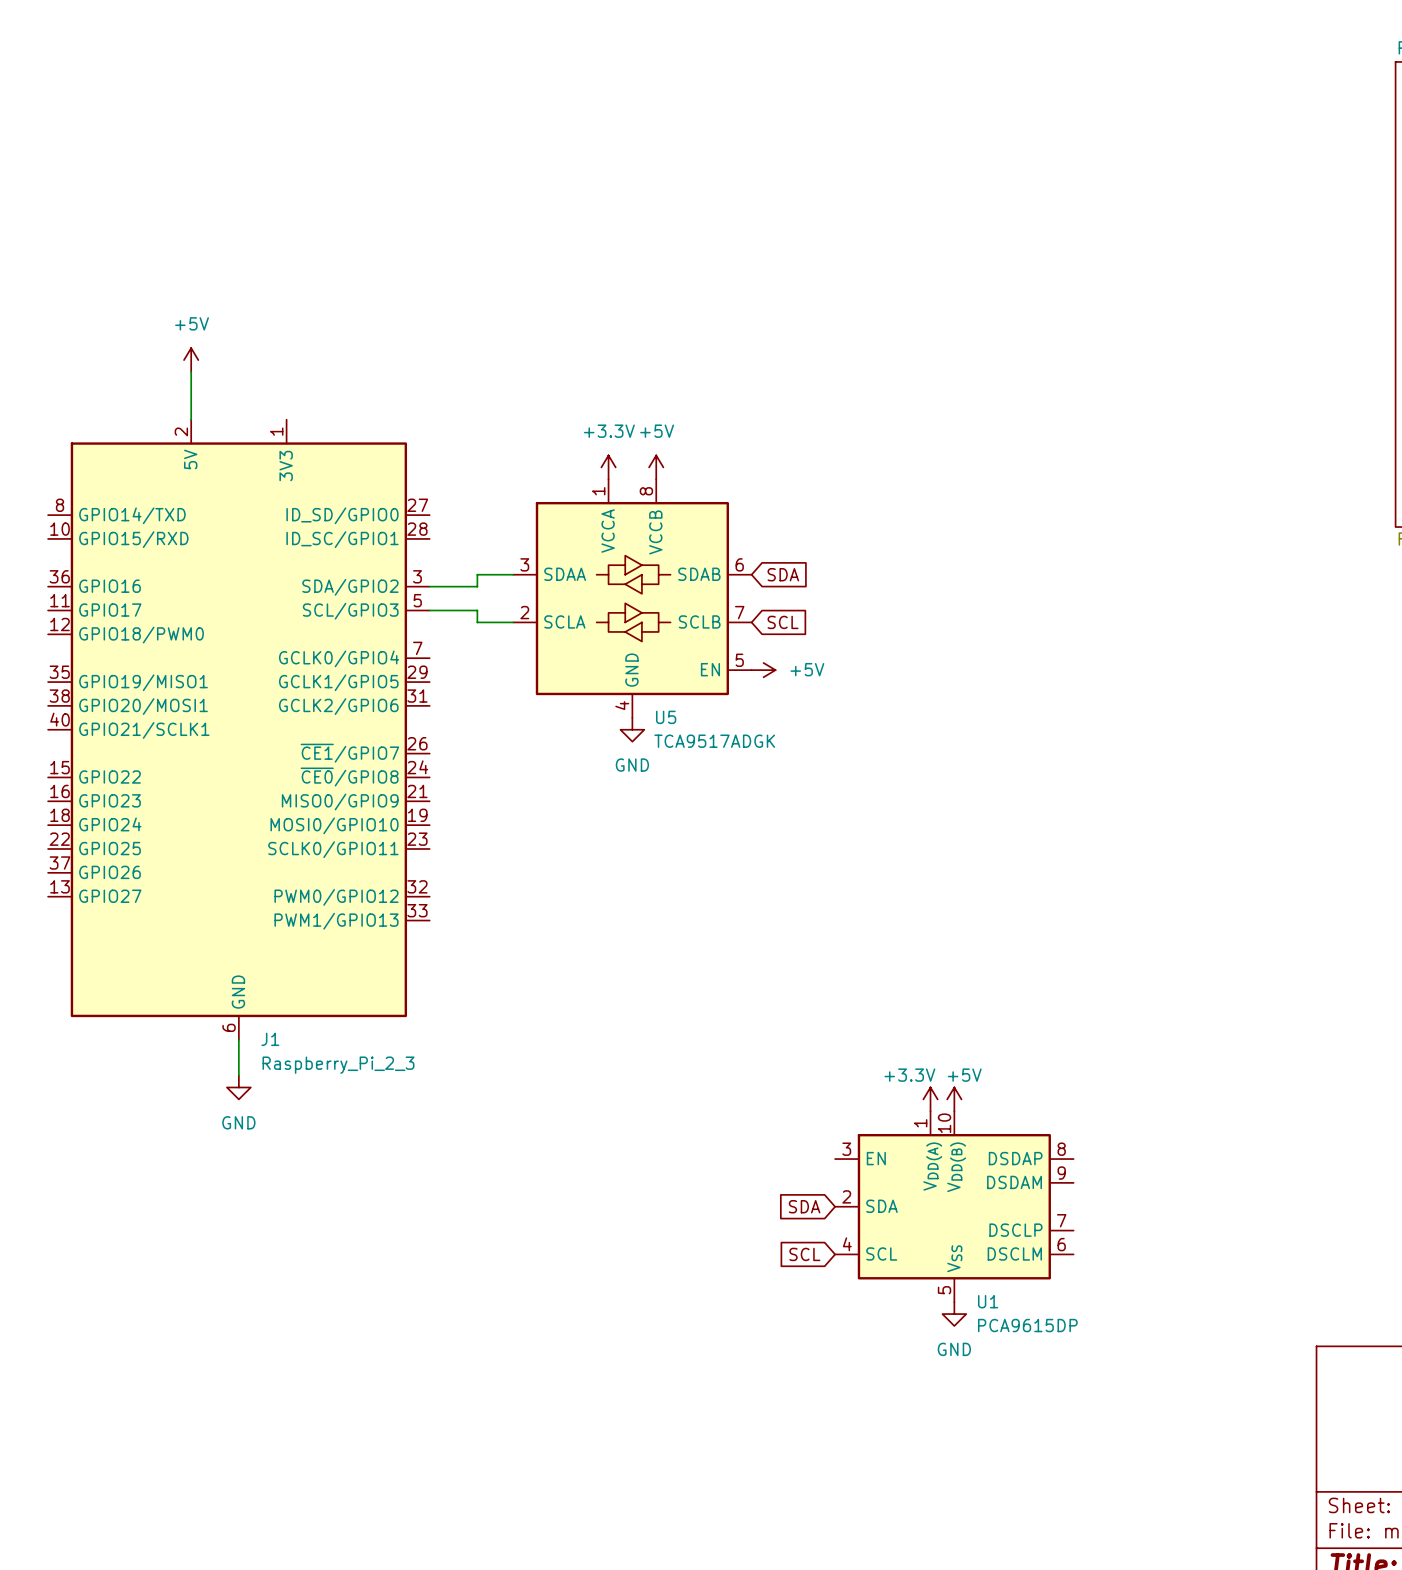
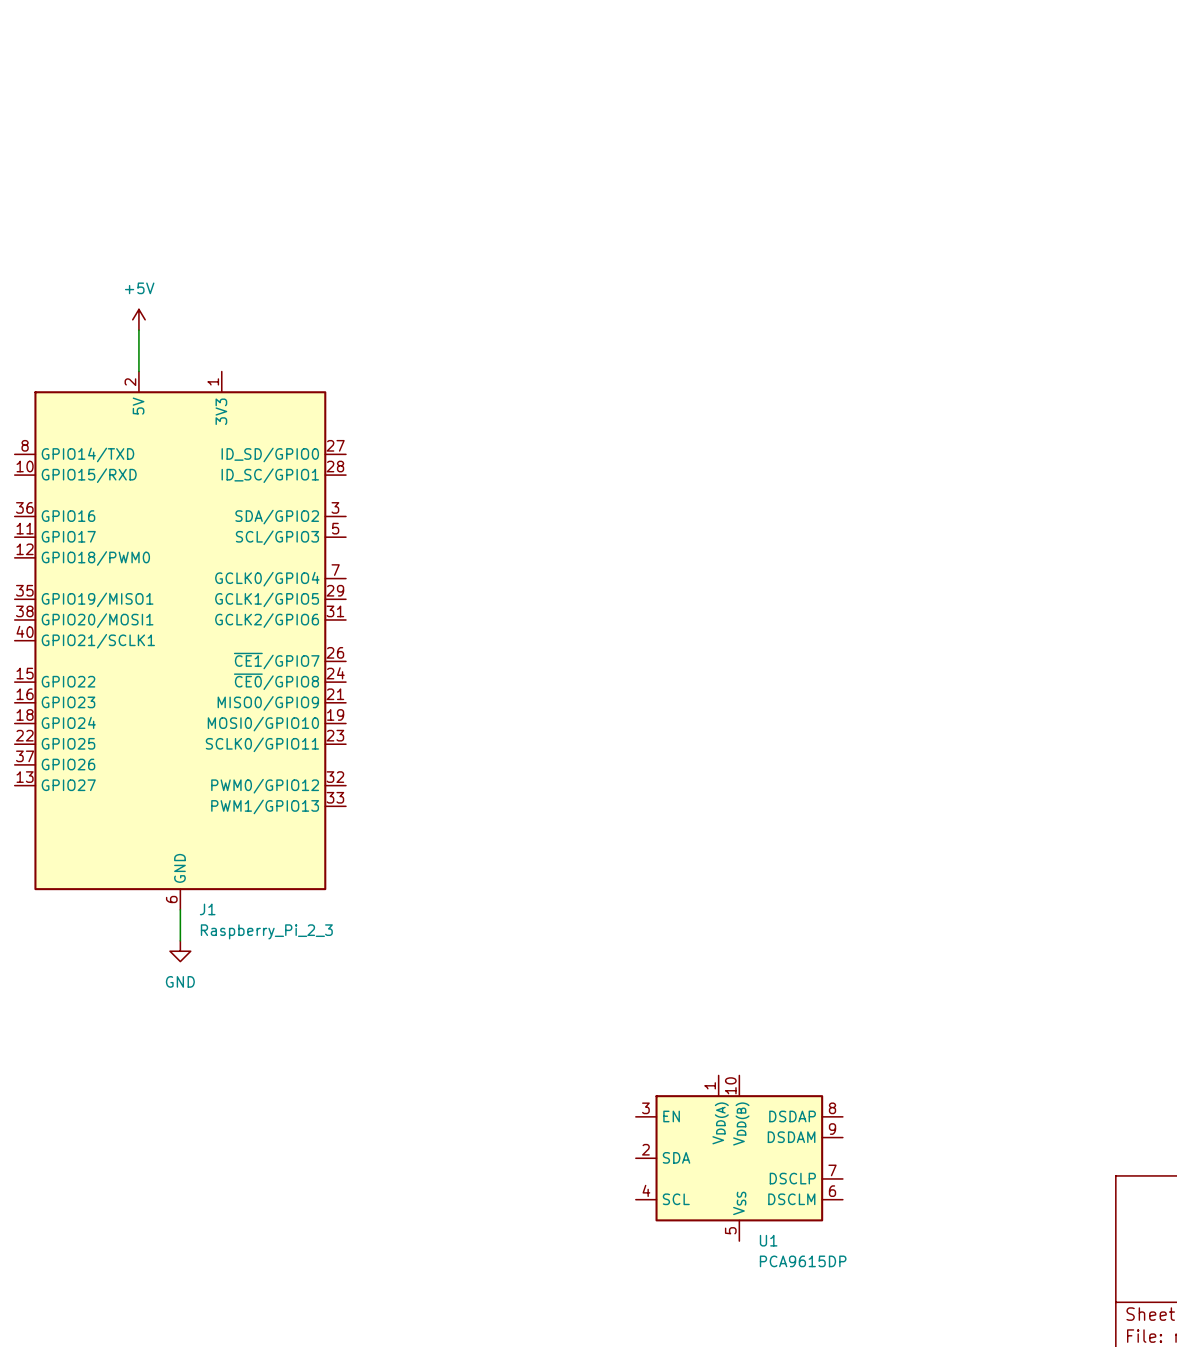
power symbol: +3.3V (608, 467) -> none
power symbol: +5V (656, 467) -> none
wire: (513, 574) (477, 574) (477, 586) (429, 586) -> none
global label: SDA (783, 574) -> none
U5: TCA9517ADGK (632, 598) -> none
wire: (429, 610) (477, 610) (477, 622) (513, 622) -> none
global label: SCL (783, 622) -> none
power symbol: +5V (763, 670) -> none
power symbol: GND (632, 729) -> none
power symbol: +3.3V (930, 1099) -> none
power symbol: +5V (954, 1099) -> none
global label: SDA (804, 1206) -> none
U1 position: (954, 1206) -> (739, 1158)
global label: SCL (804, 1254) -> none
power symbol: GND (954, 1314) -> none

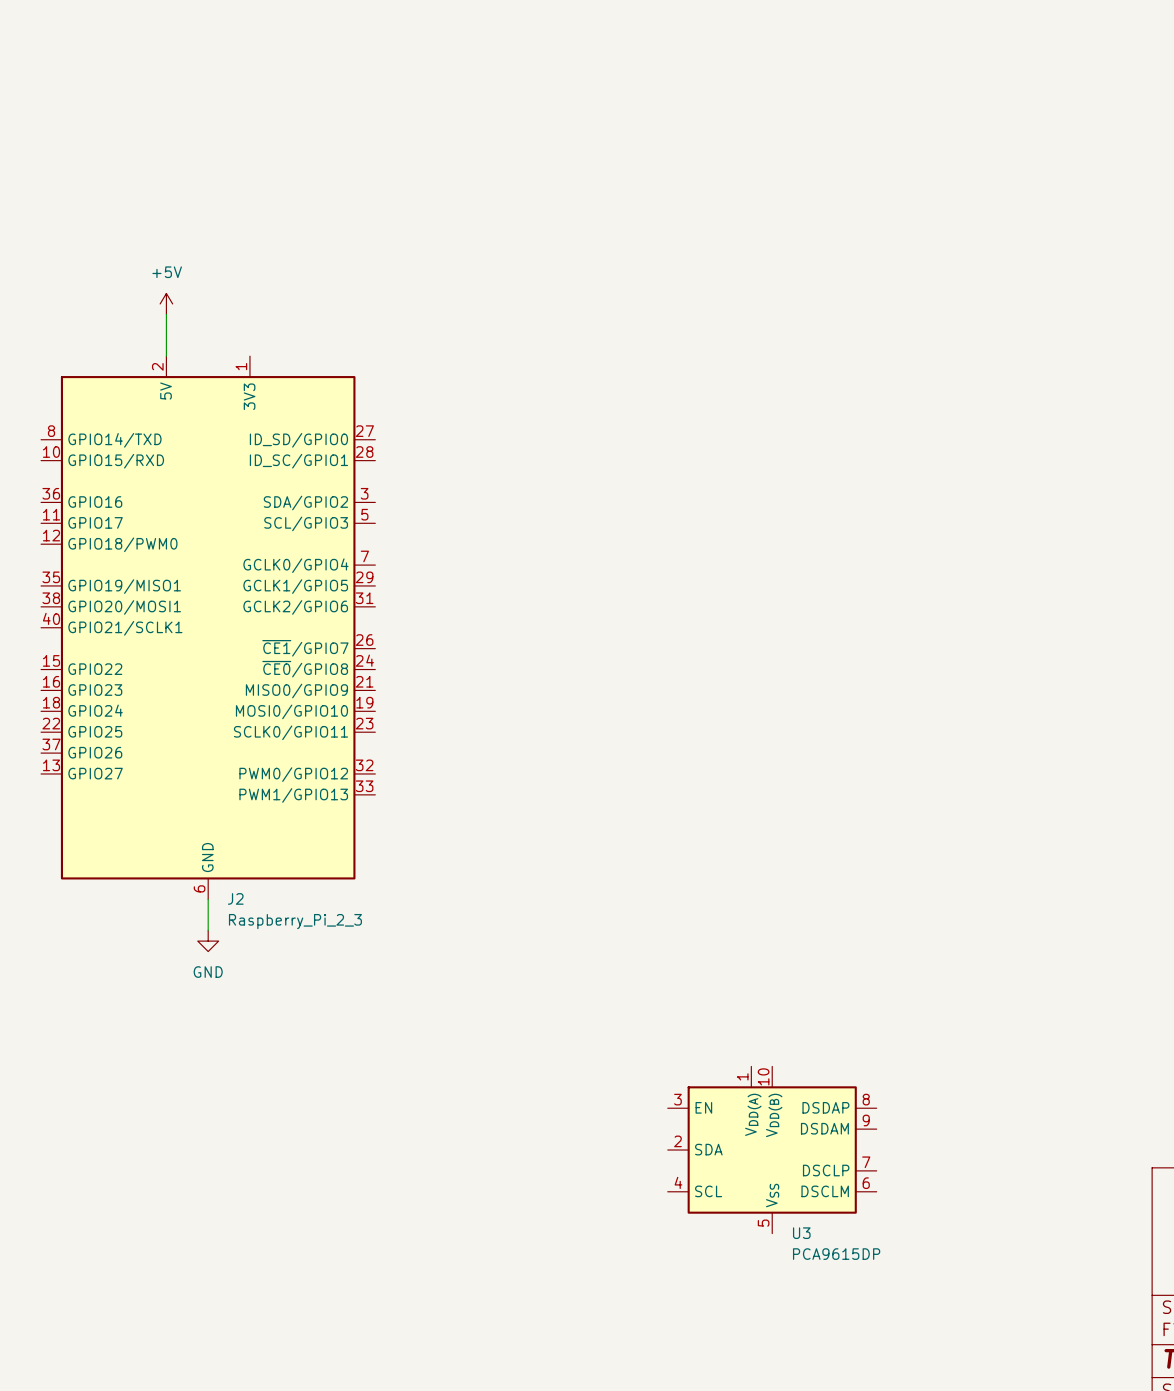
J1 name: J1 (207, 909) -> J2 (235, 898)
U1 name: U1 (768, 1240) -> U3 (801, 1233)

